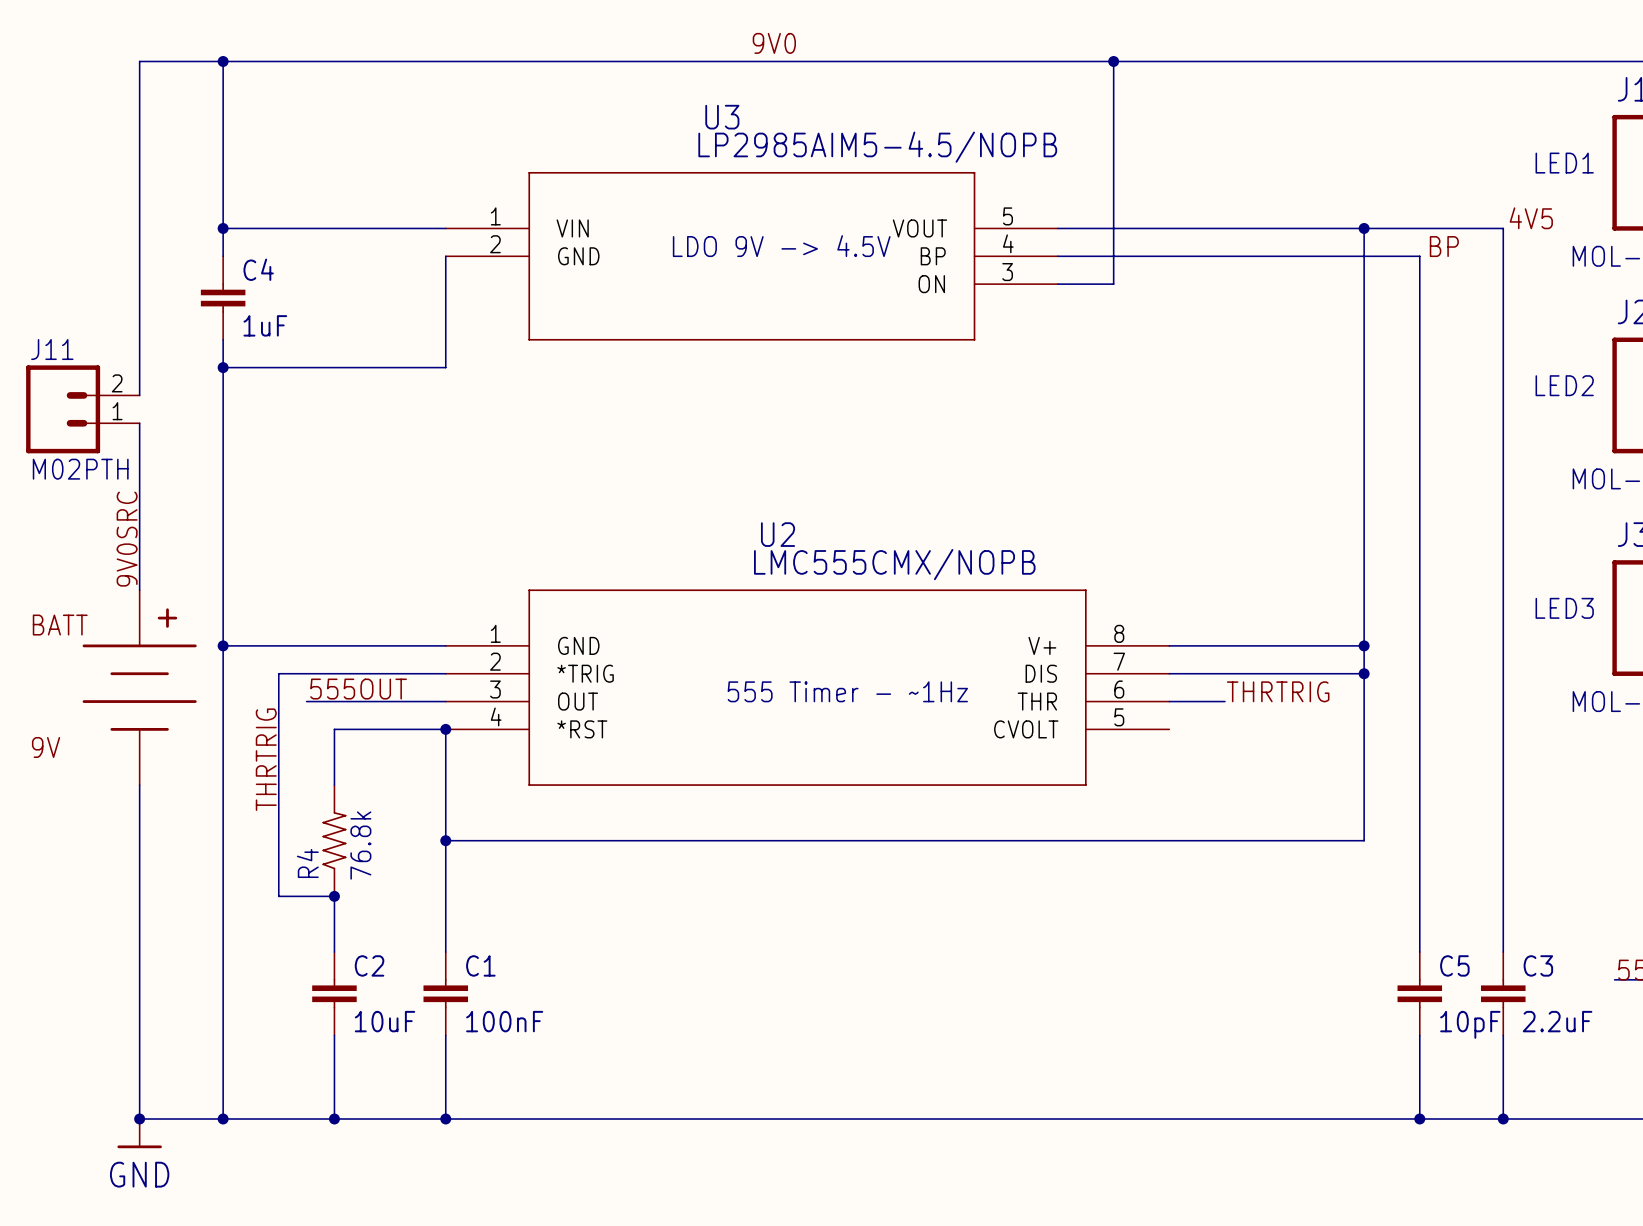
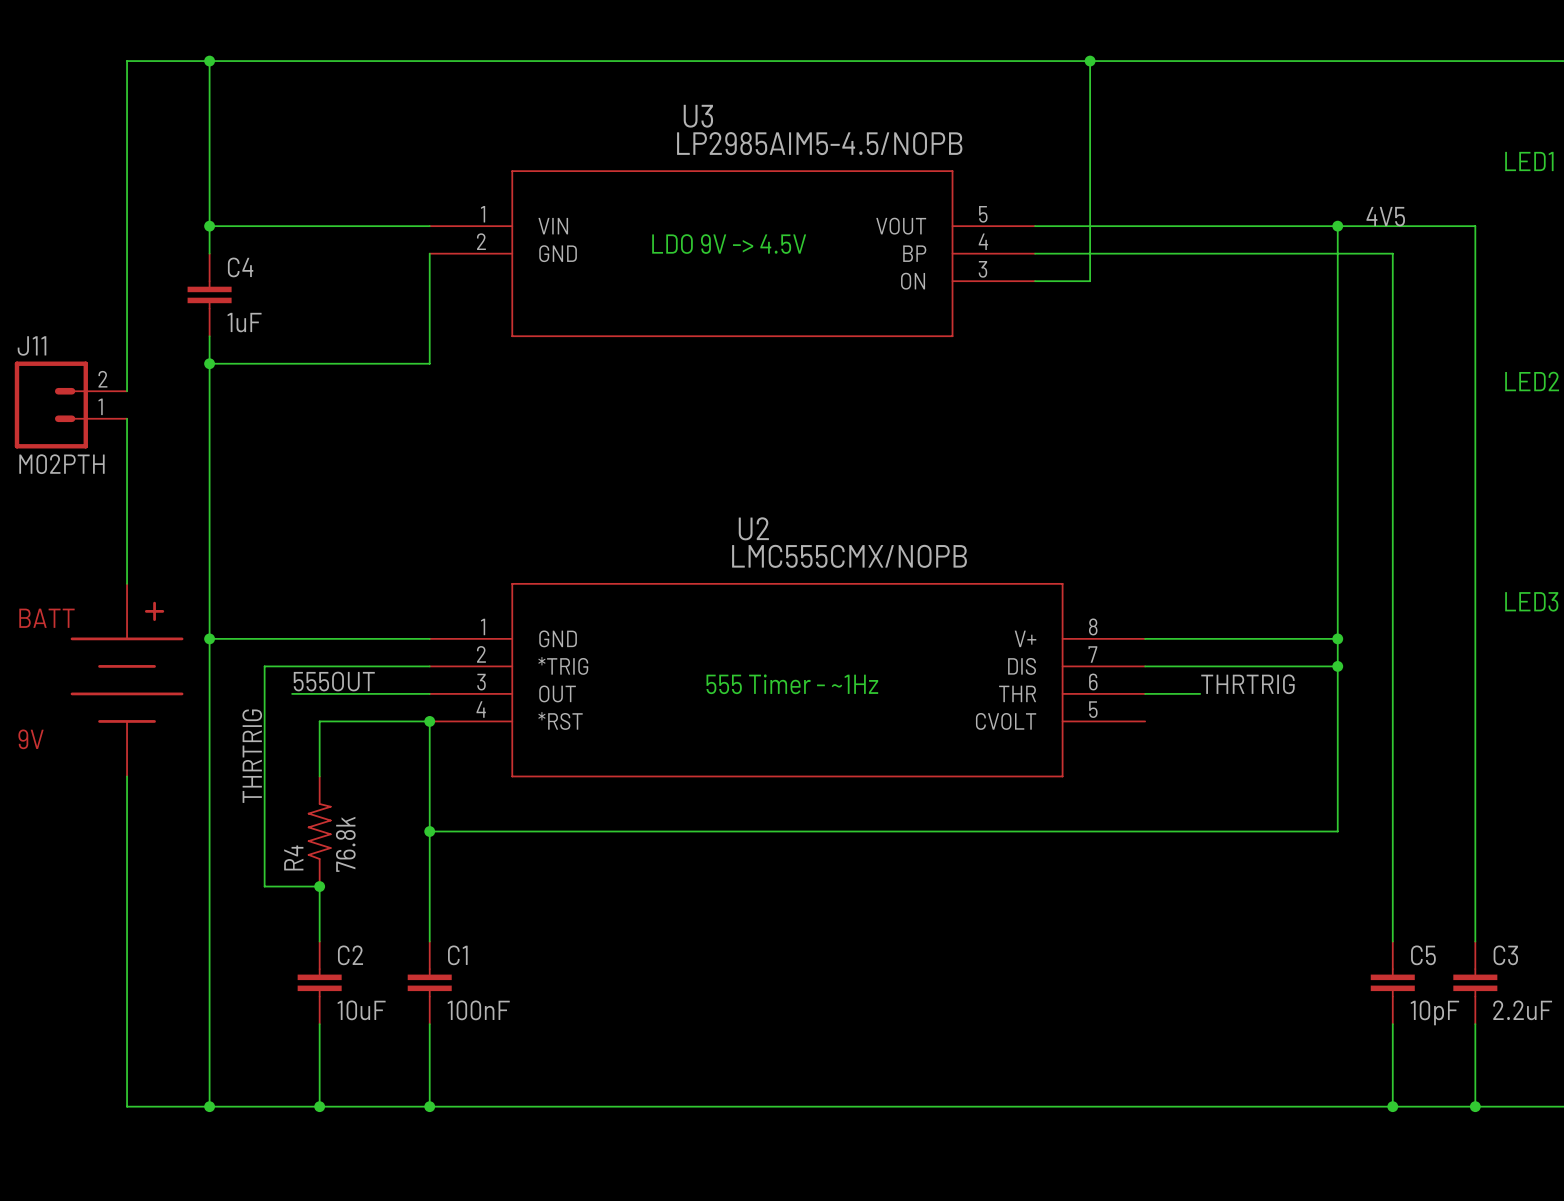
label: 9V0 (774, 43) -> none
label position: 4V5 (1531, 218) -> 4V5 (1385, 216)
label: BP (1444, 246) -> none
label: 9V0SRC (127, 539) -> none
junction: (139, 1118) -> none
power symbol: GND (139, 1133) -> none

